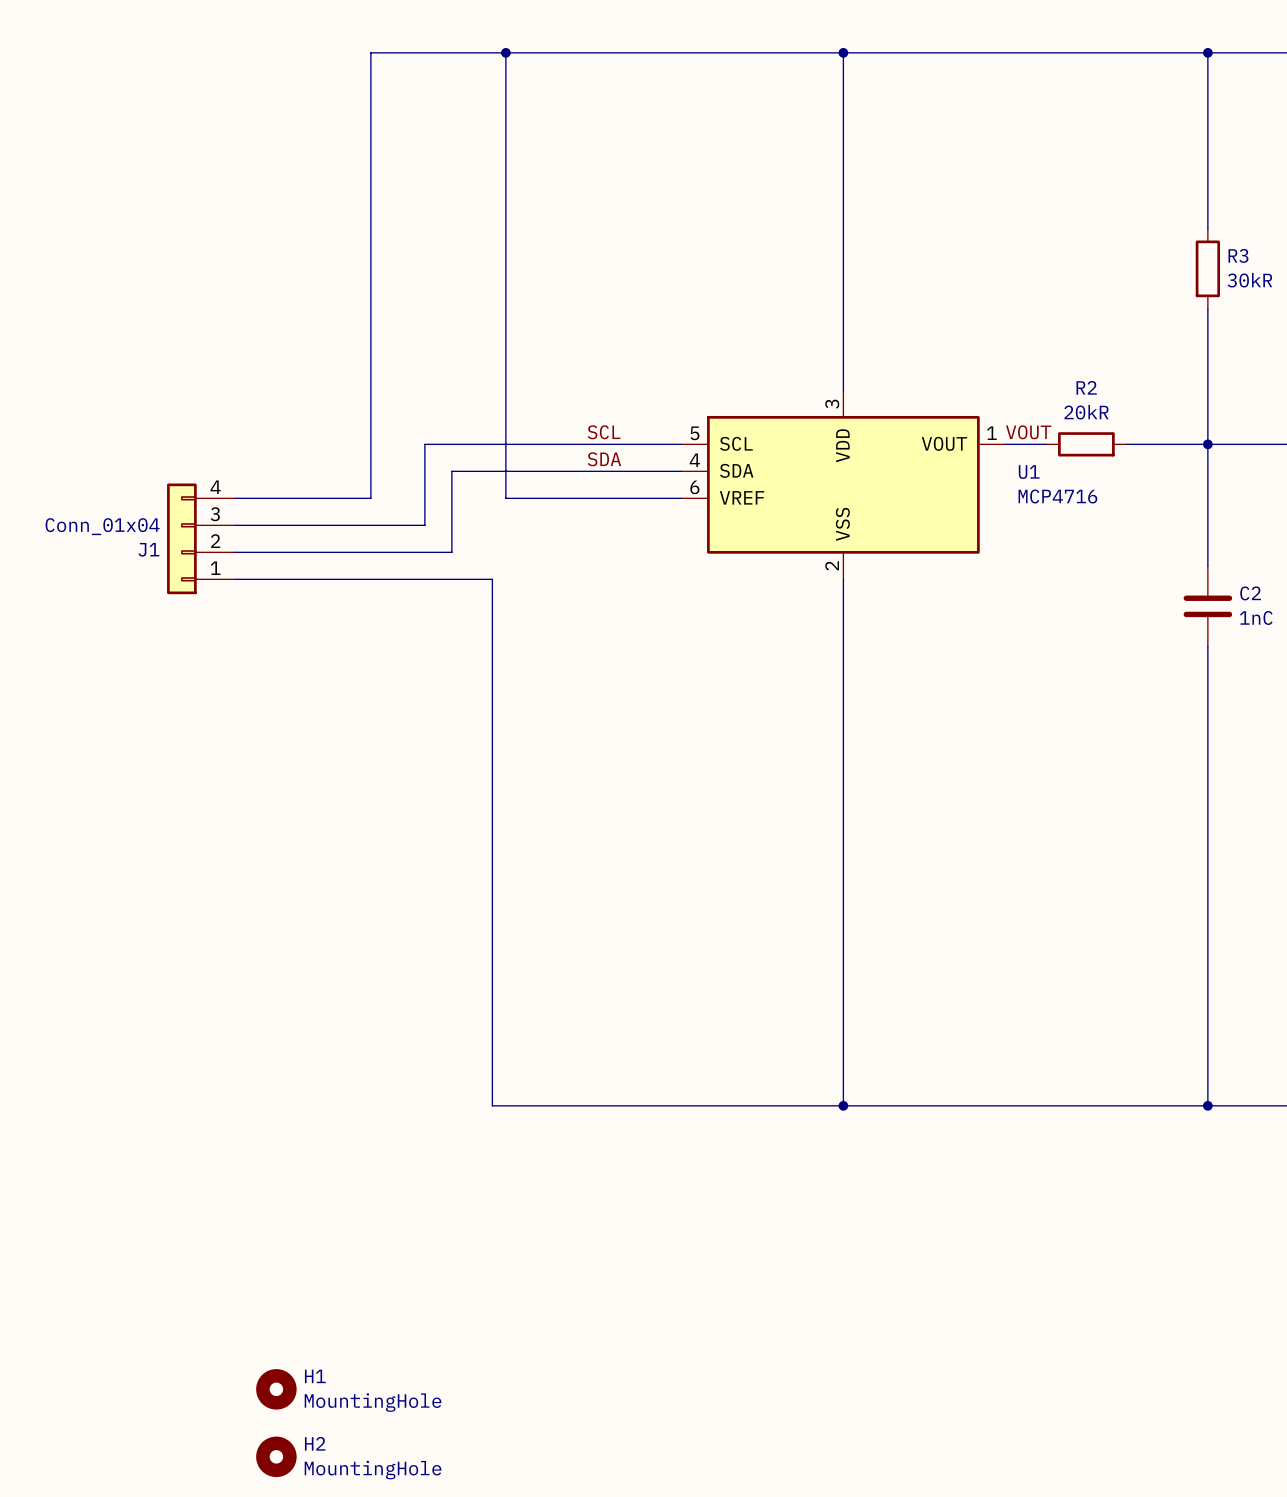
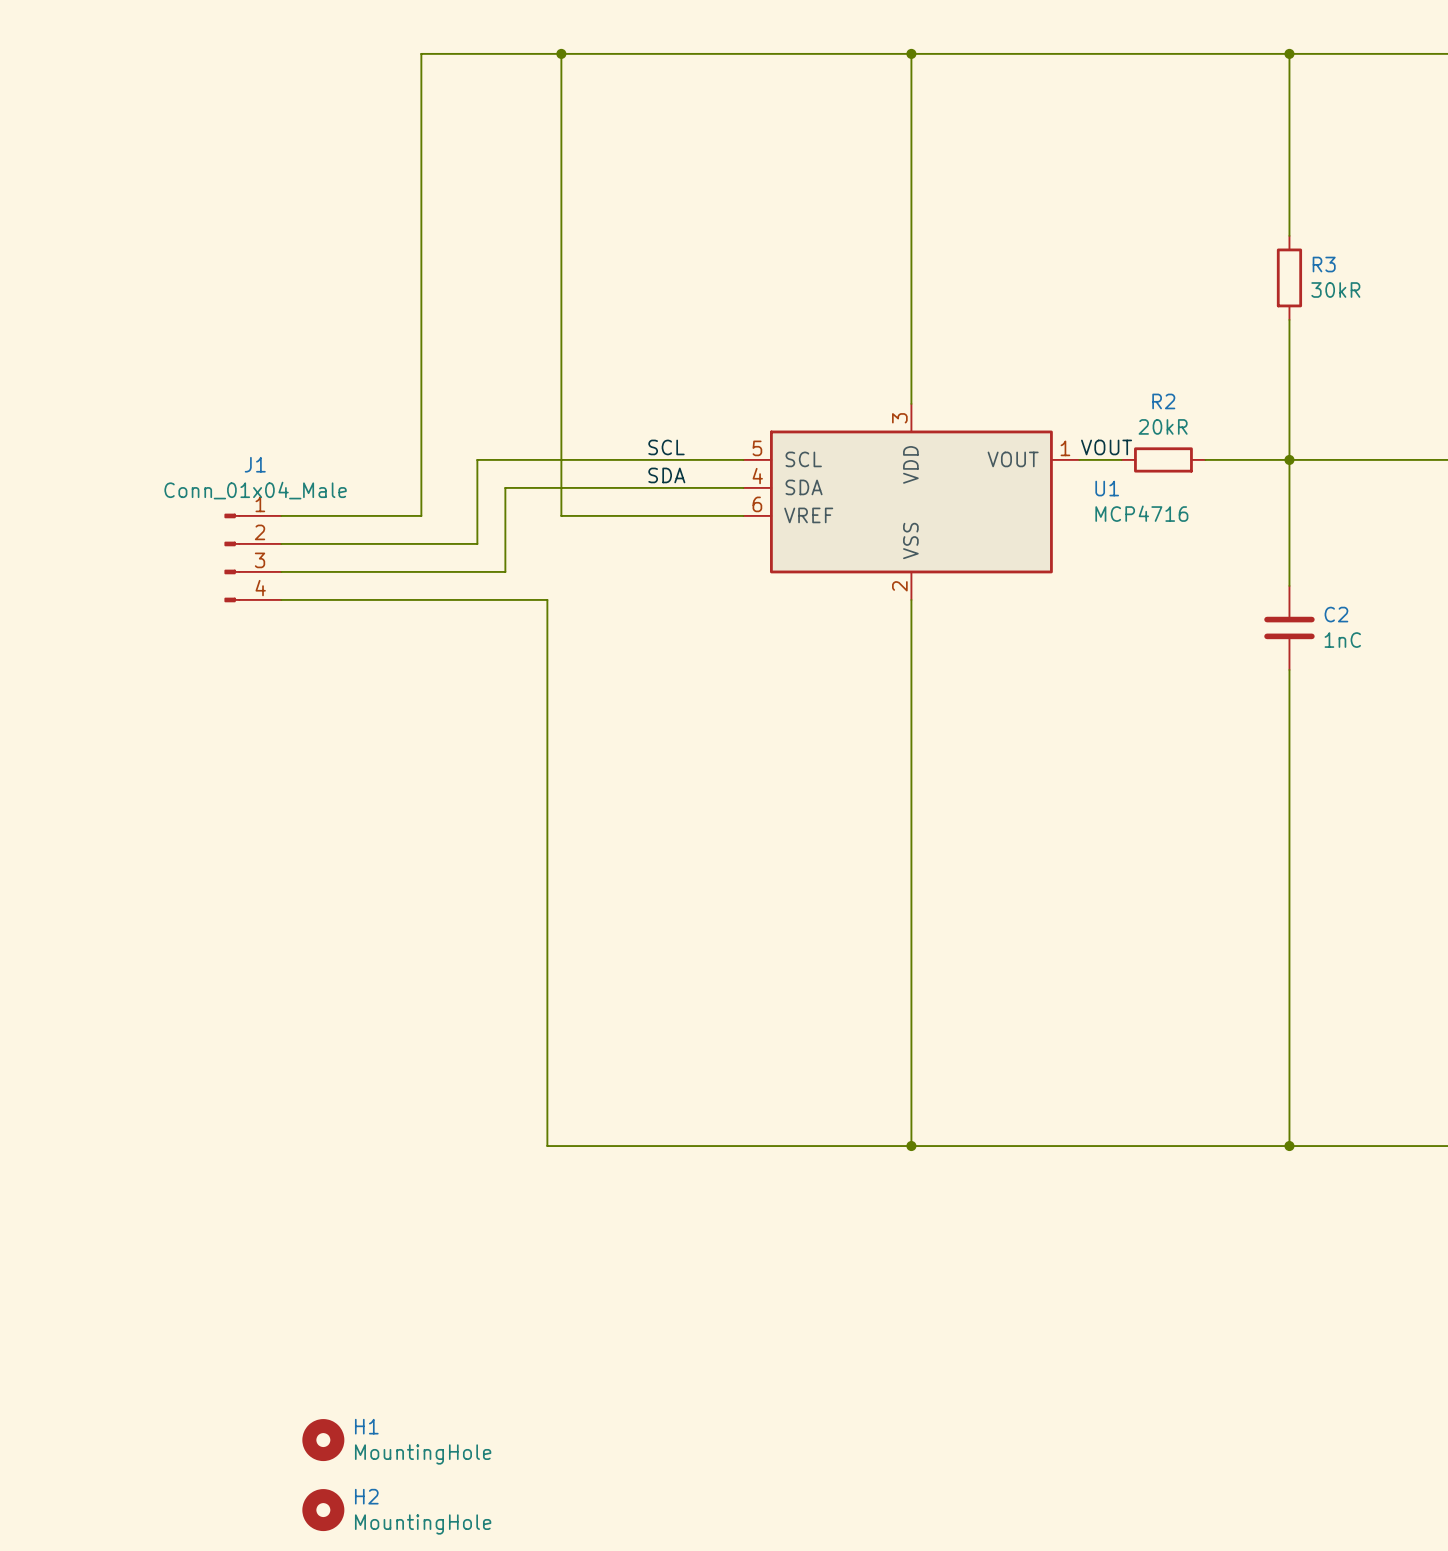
J1 symbol: [167, 483, 236, 595] -> [224, 513, 282, 603]
J1 value: Conn_01x04 (102, 526) -> Conn_01x04_Male (255, 490)
J1 name position: J1 (148, 549) -> J1 (255, 464)

